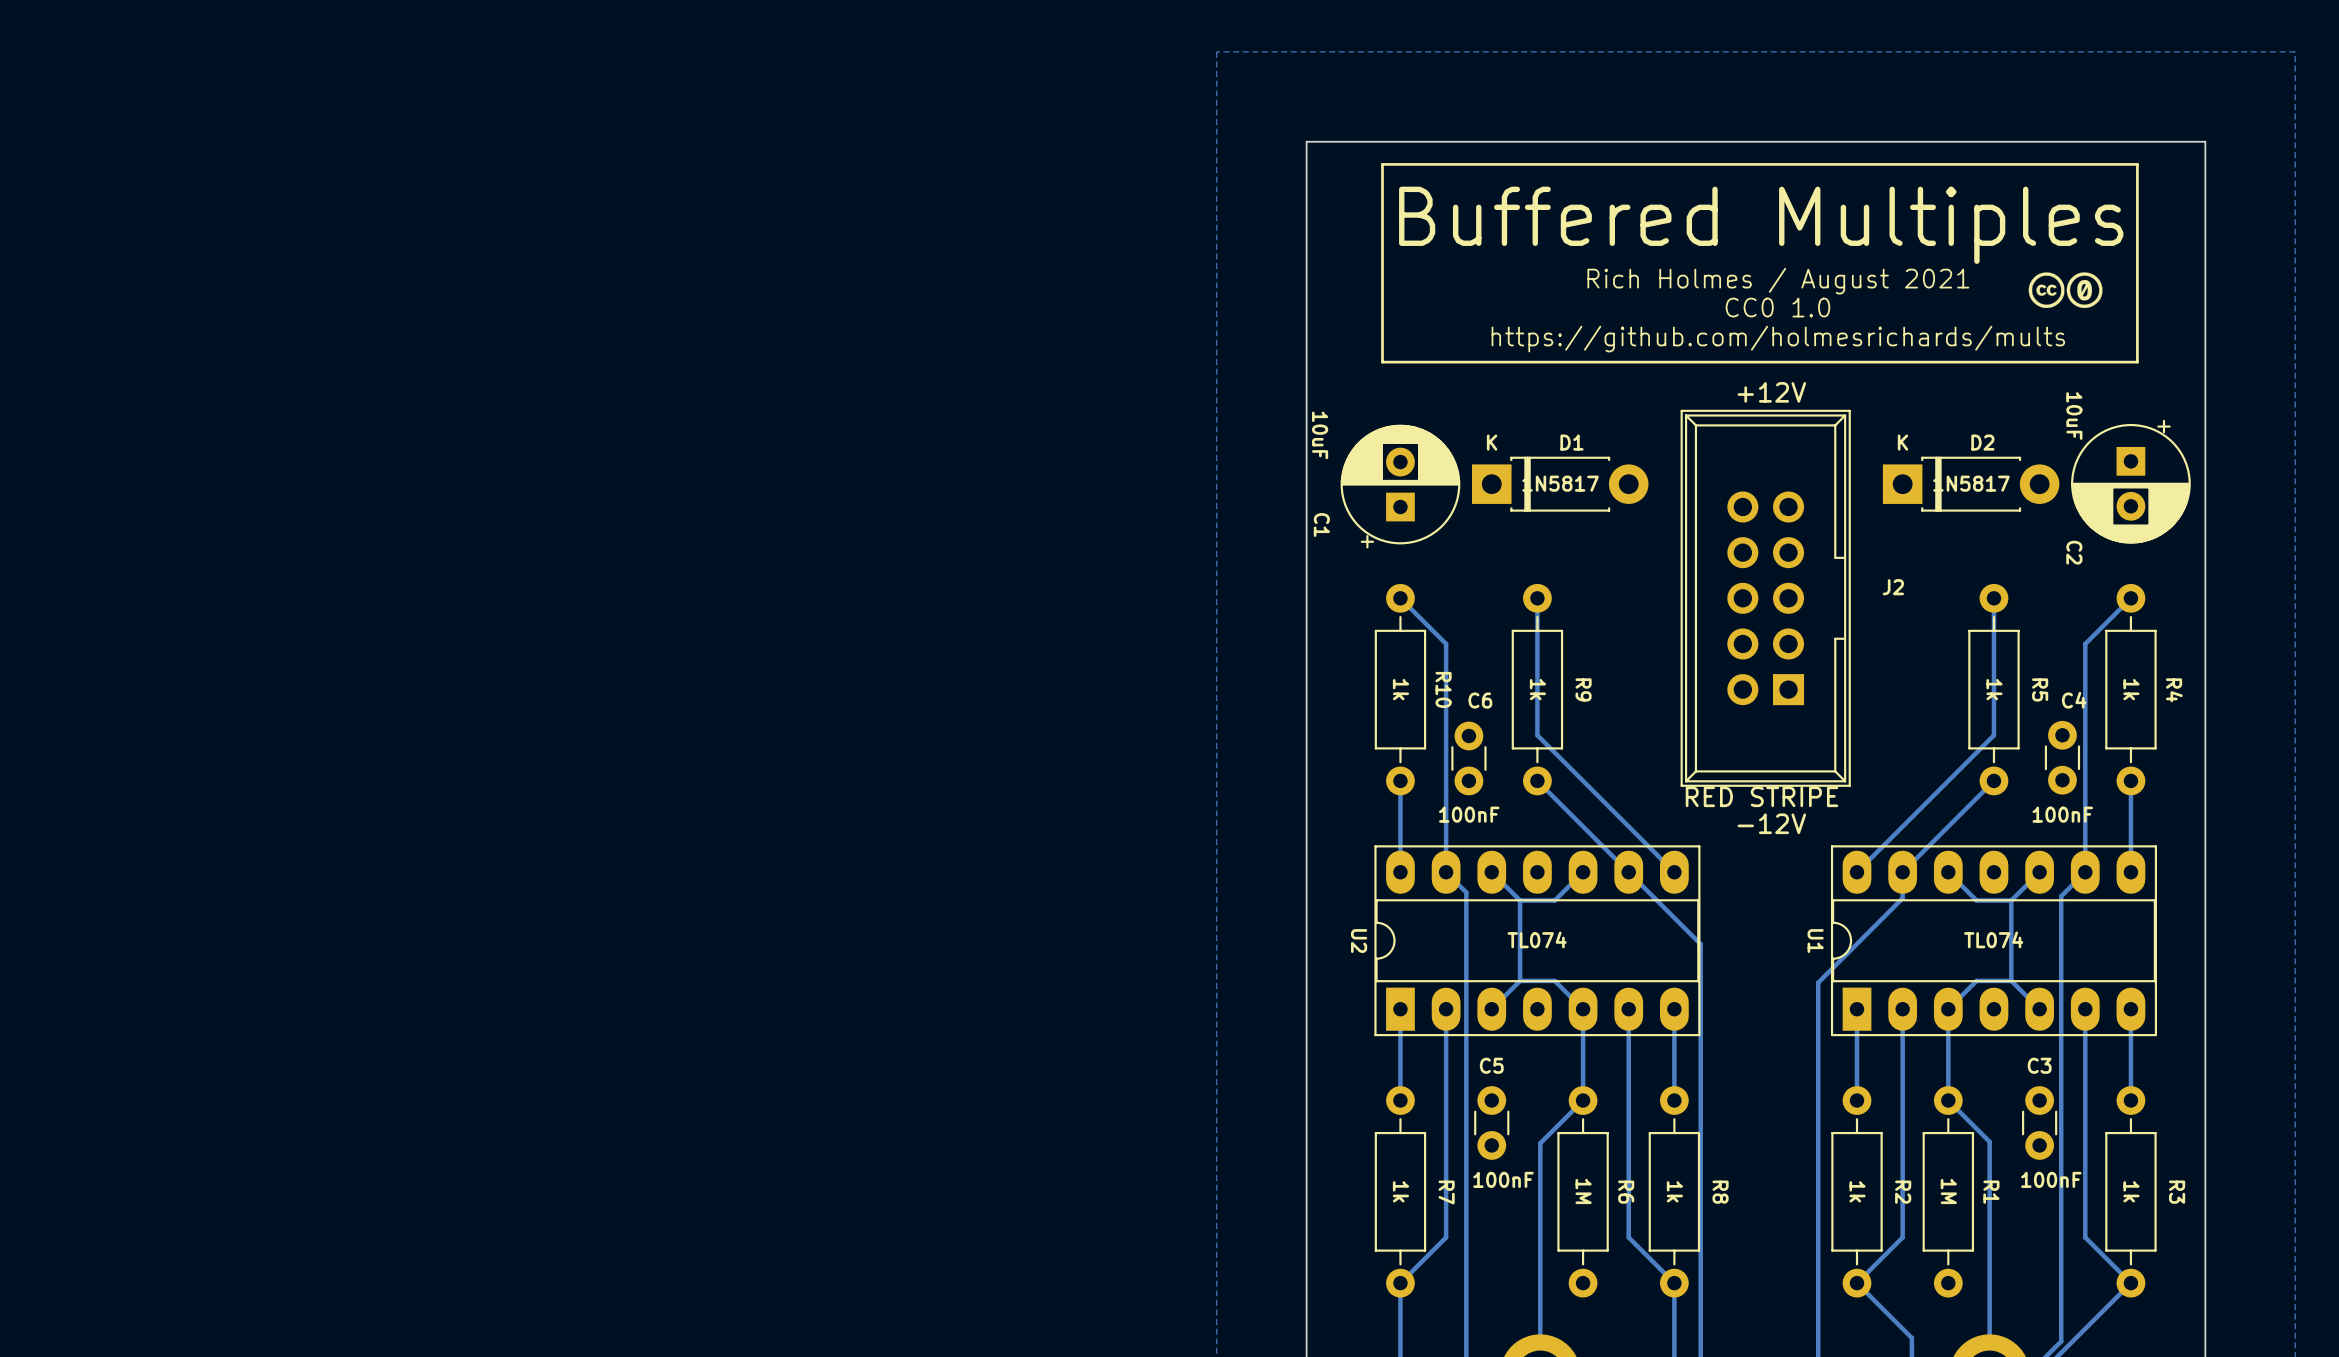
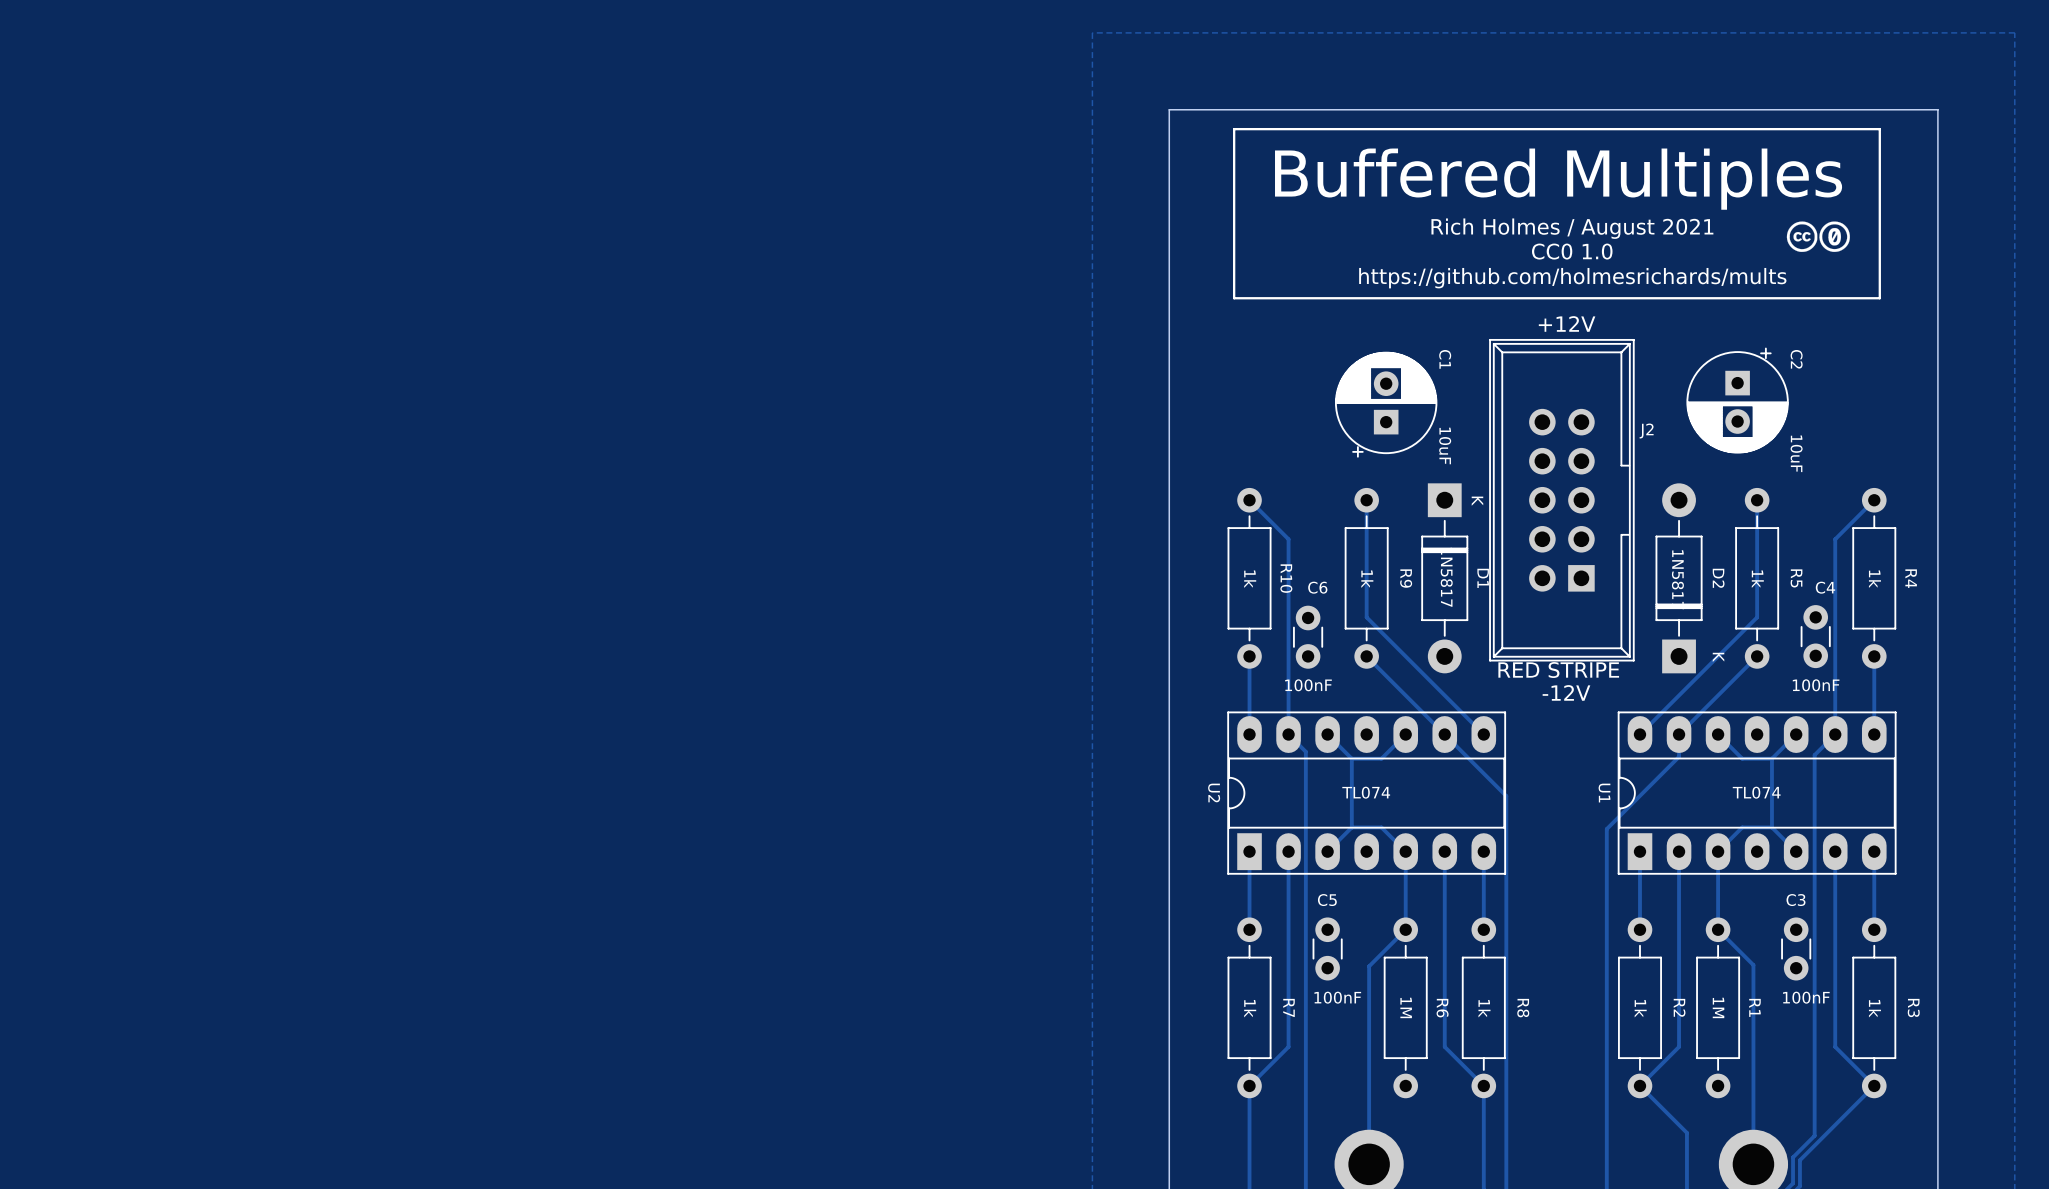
C2 value position: 10uF (2074, 416) -> 10uF (1796, 453)
C1 value position: 10uF (1320, 435) -> 10uF (1445, 445)
D1 name position: D1 (1571, 442) -> D1 (1483, 578)
D2 name position: D2 (1982, 442) -> D2 (1718, 578)
D1 footprint: [1471, 456, 1649, 512] -> [1421, 483, 1469, 674]
D2 footprint: [1882, 456, 2060, 512] -> [1655, 483, 1703, 674]
C2 position: (2130, 481) -> (1737, 400)
C1 position: (1400, 486) -> (1386, 404)
C1 name position: C1 (1321, 524) -> C1 (1445, 359)
C2 name position: C2 (2074, 552) -> C2 (1796, 359)
J2 name position: J2 (1893, 587) -> J2 (1646, 431)

